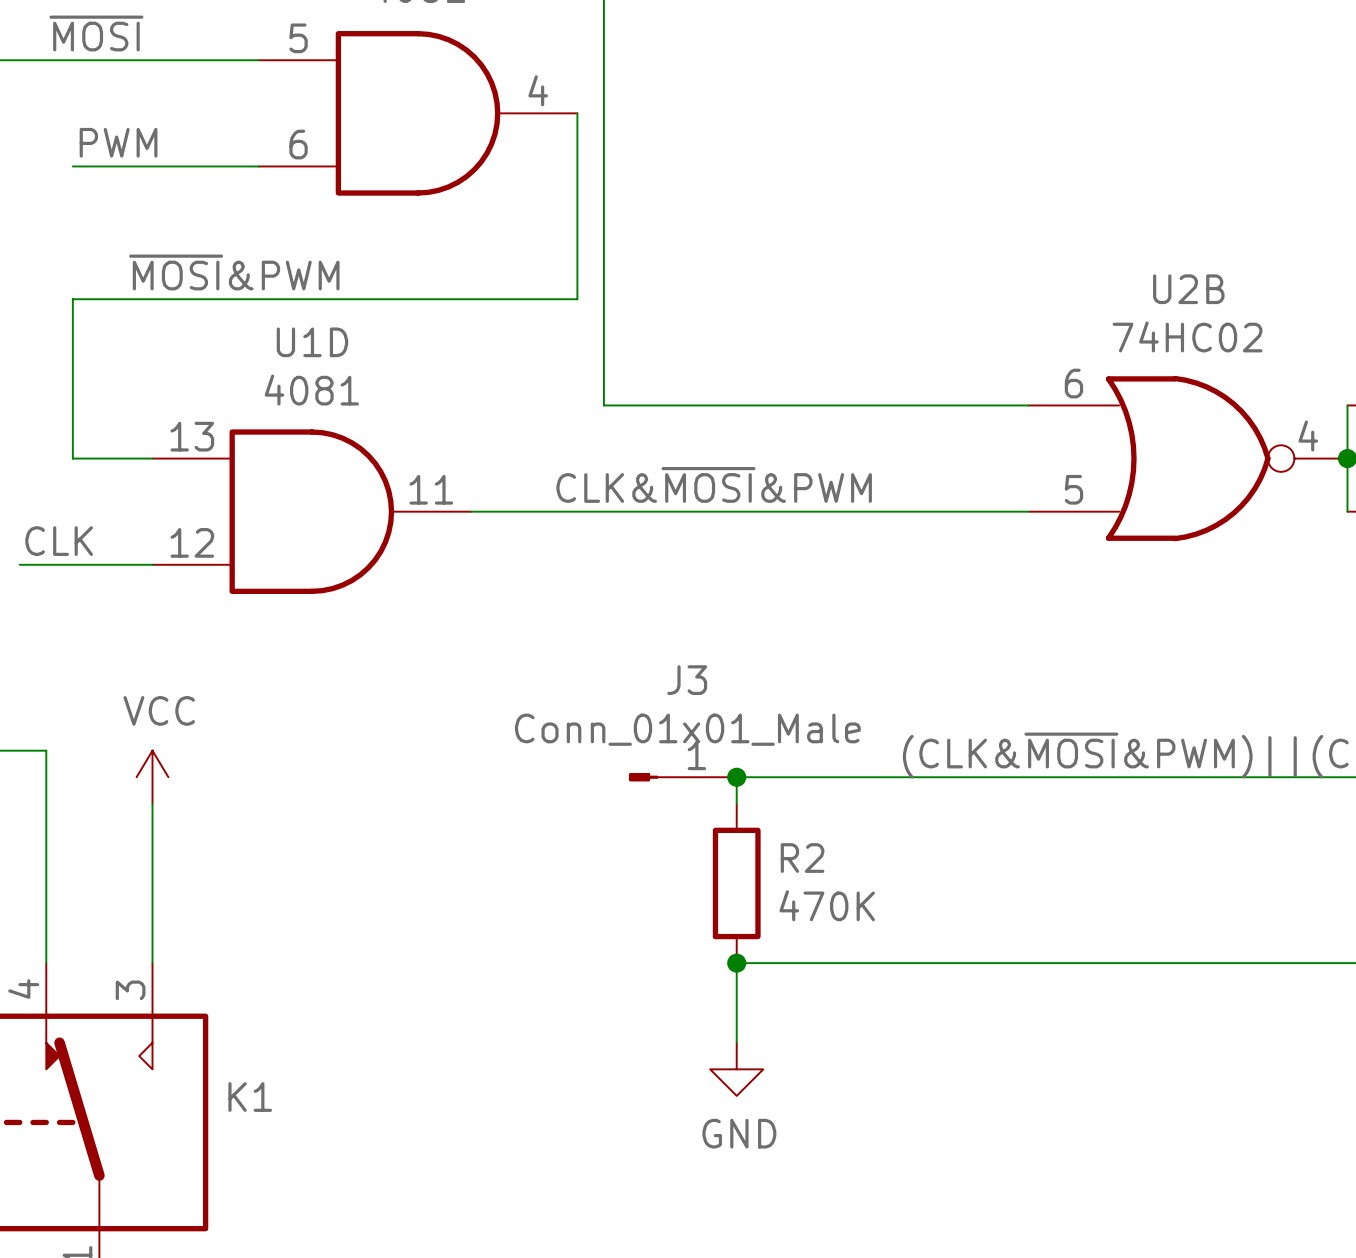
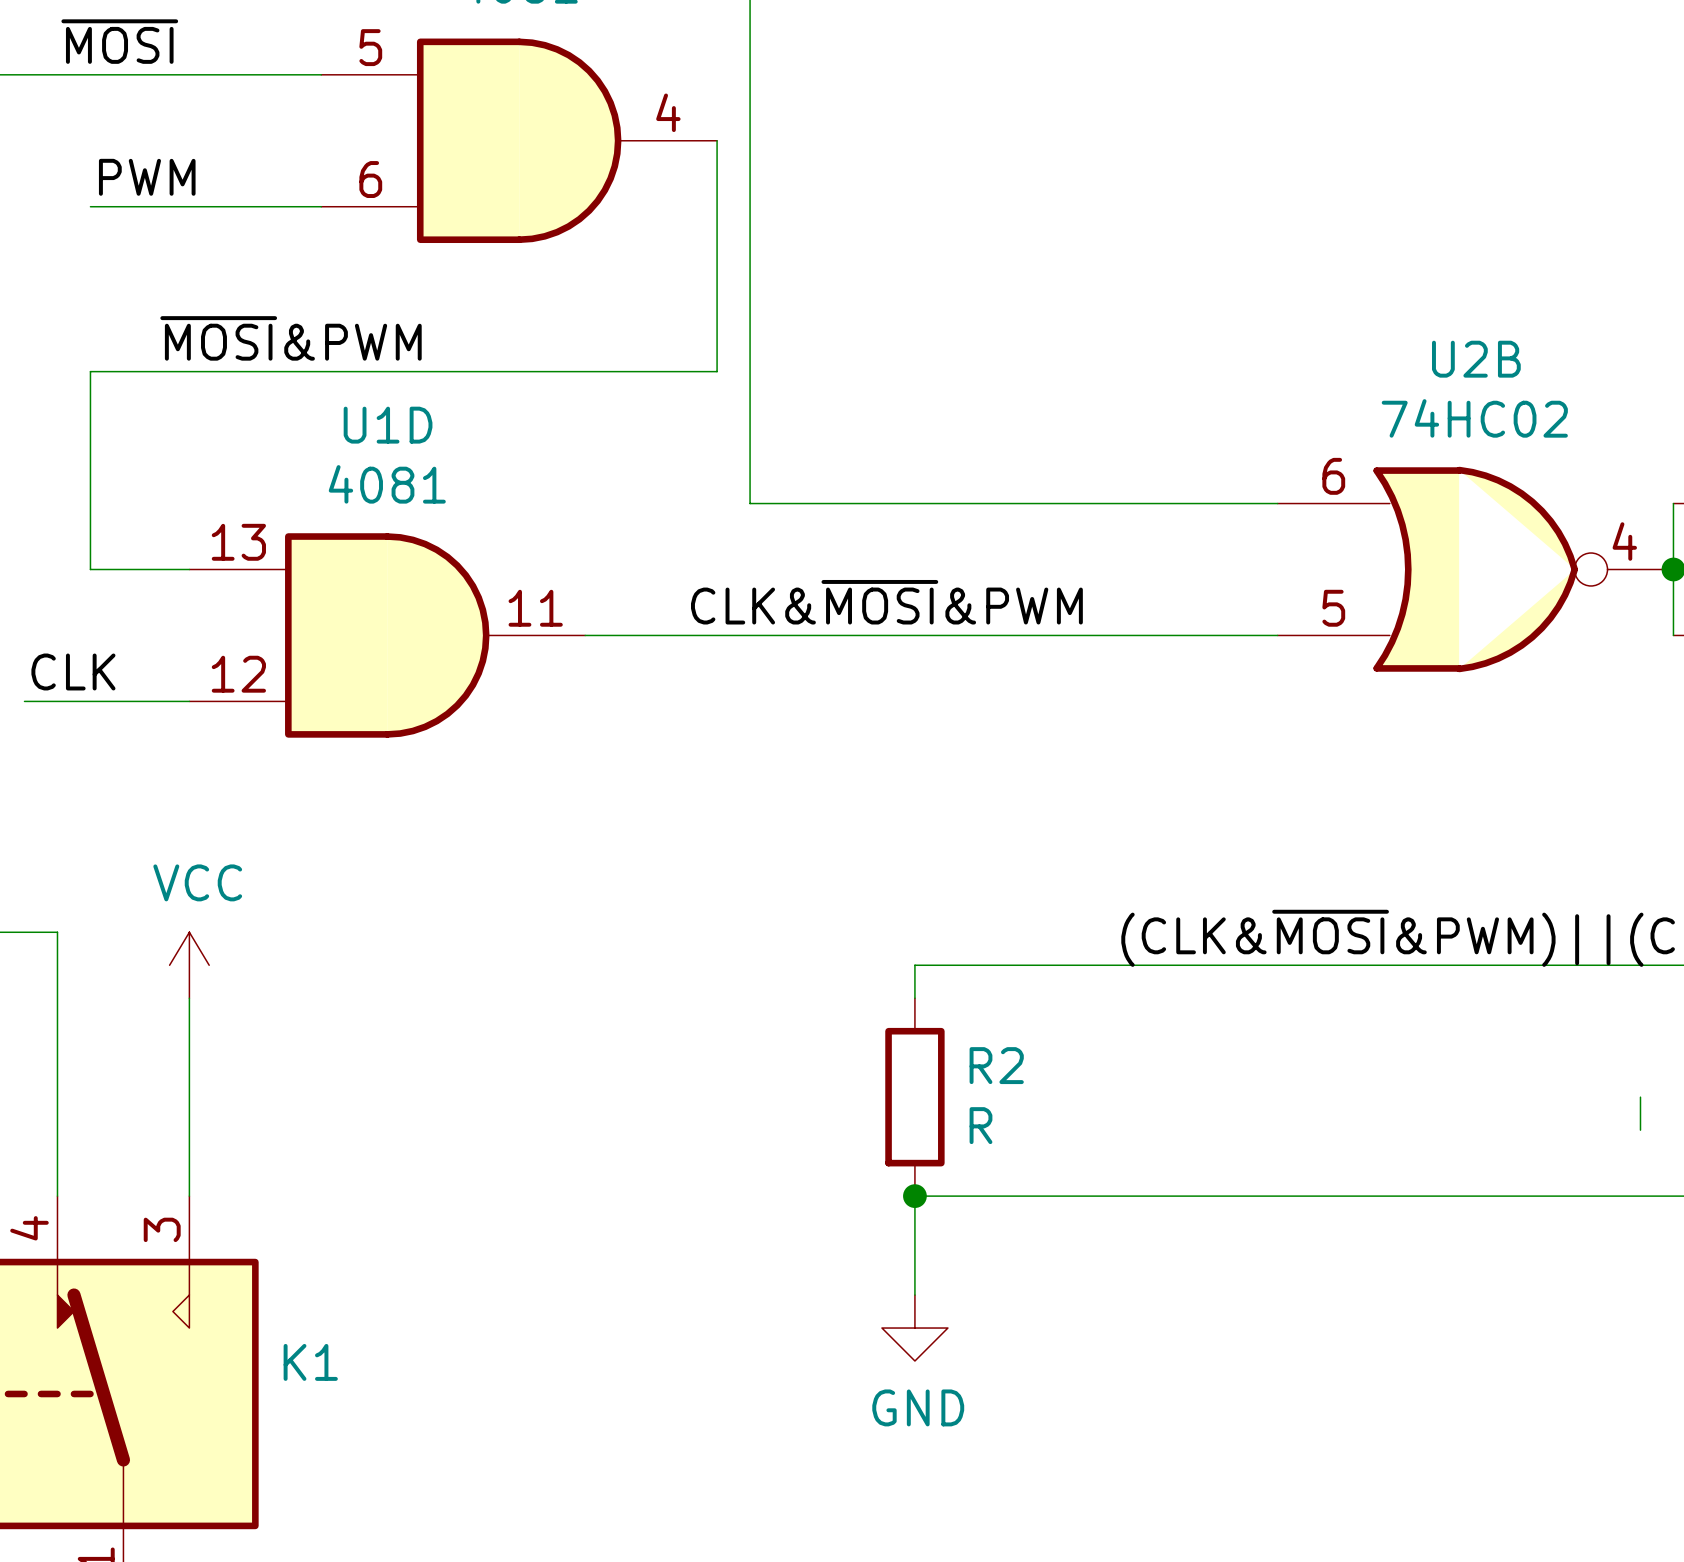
J3: Conn_01x01_Male (682, 777) -> none
junction: (736, 777) -> none
wire: none -> (1640, 1097) (1640, 1130)
R2 value: 470K (827, 905) -> R (980, 1125)

